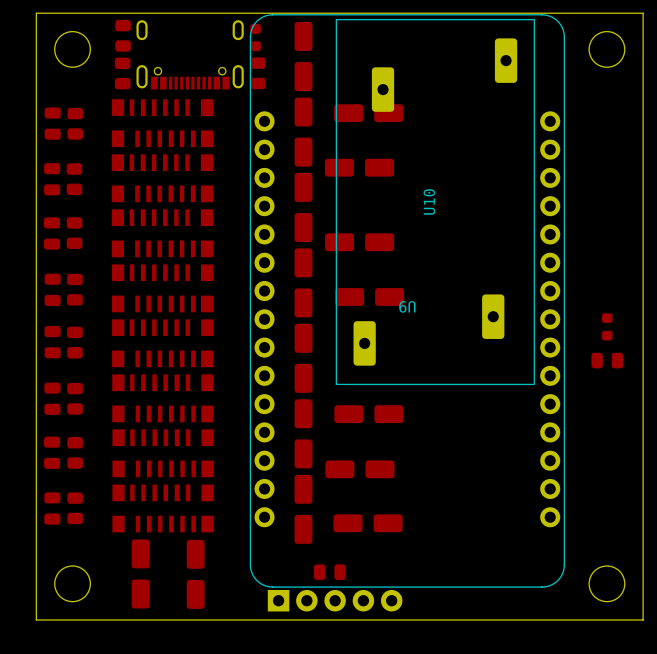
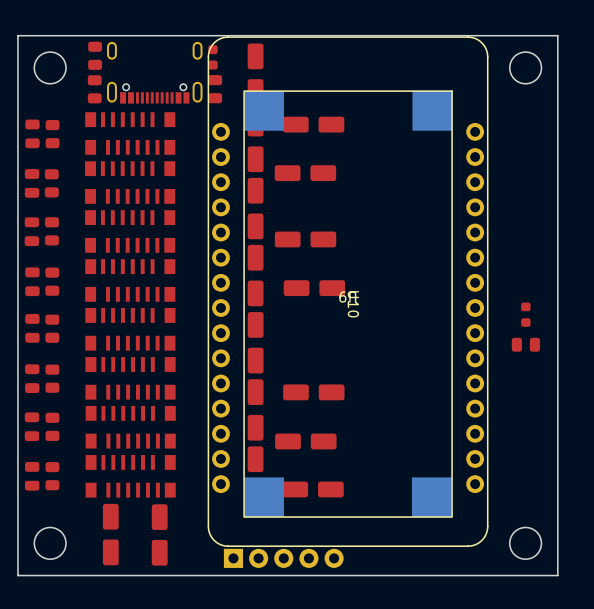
U10 footprint: [335, 19, 535, 385] -> [243, 90, 453, 518]
part: (329, 572) -> none

